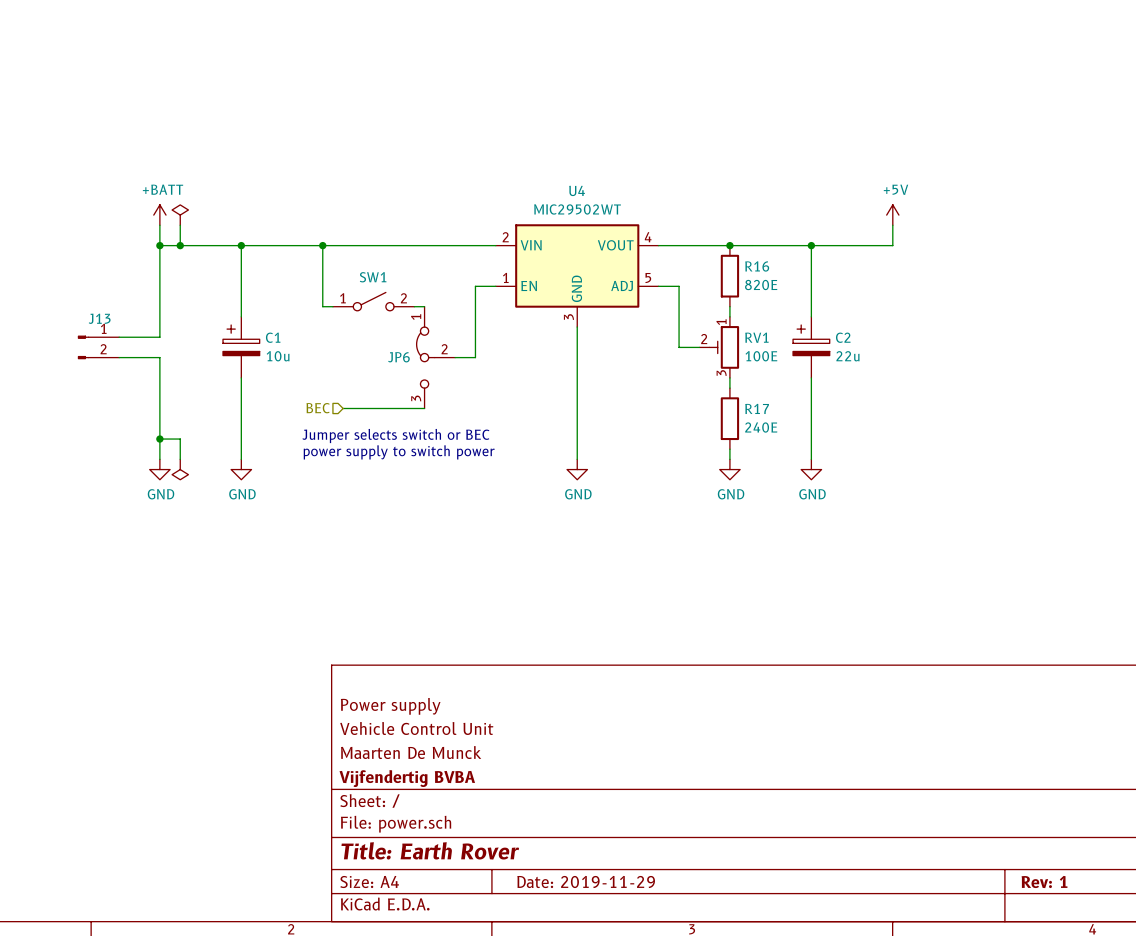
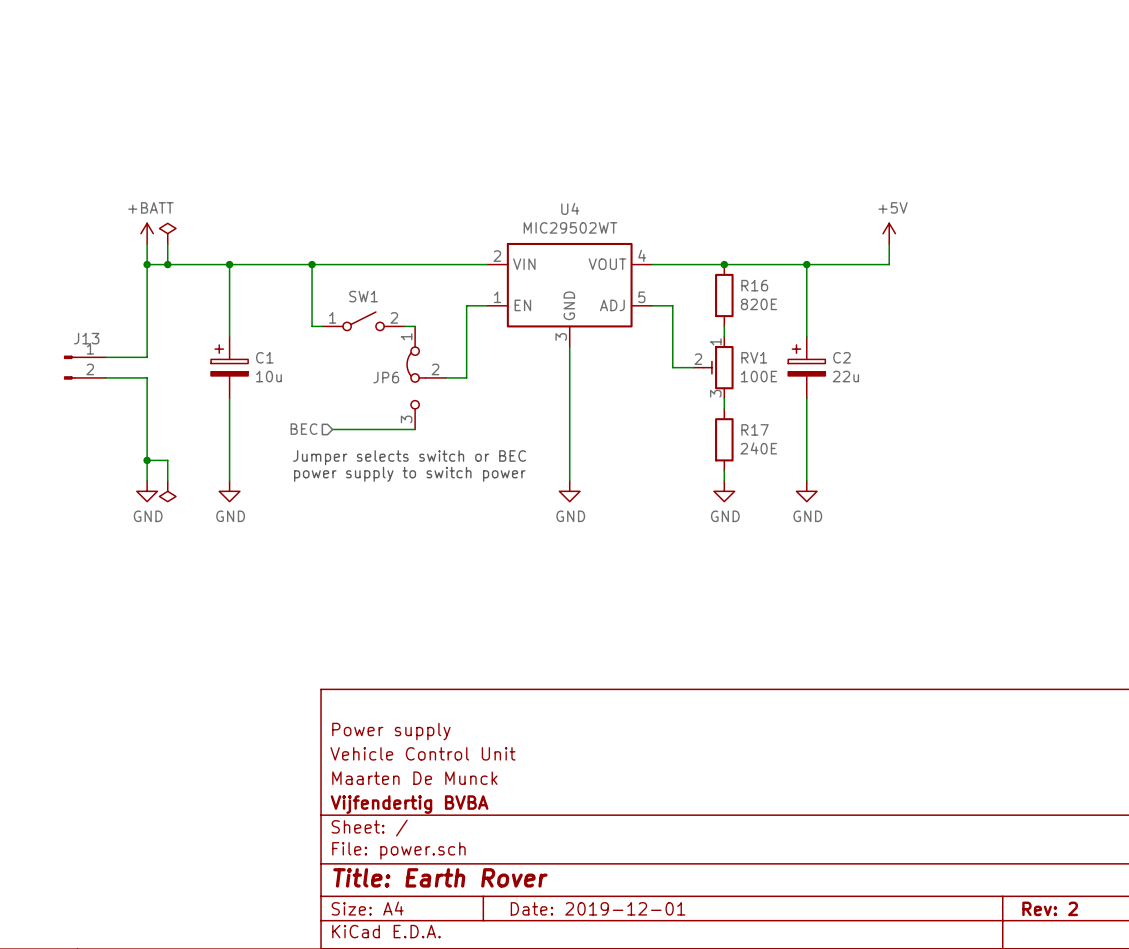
title block: Date: 2019-11-29 (586, 881) -> Date: 2019-12-01 (598, 908)
title block: Rev: 1 (1044, 882) -> Rev: 2 (1050, 908)

